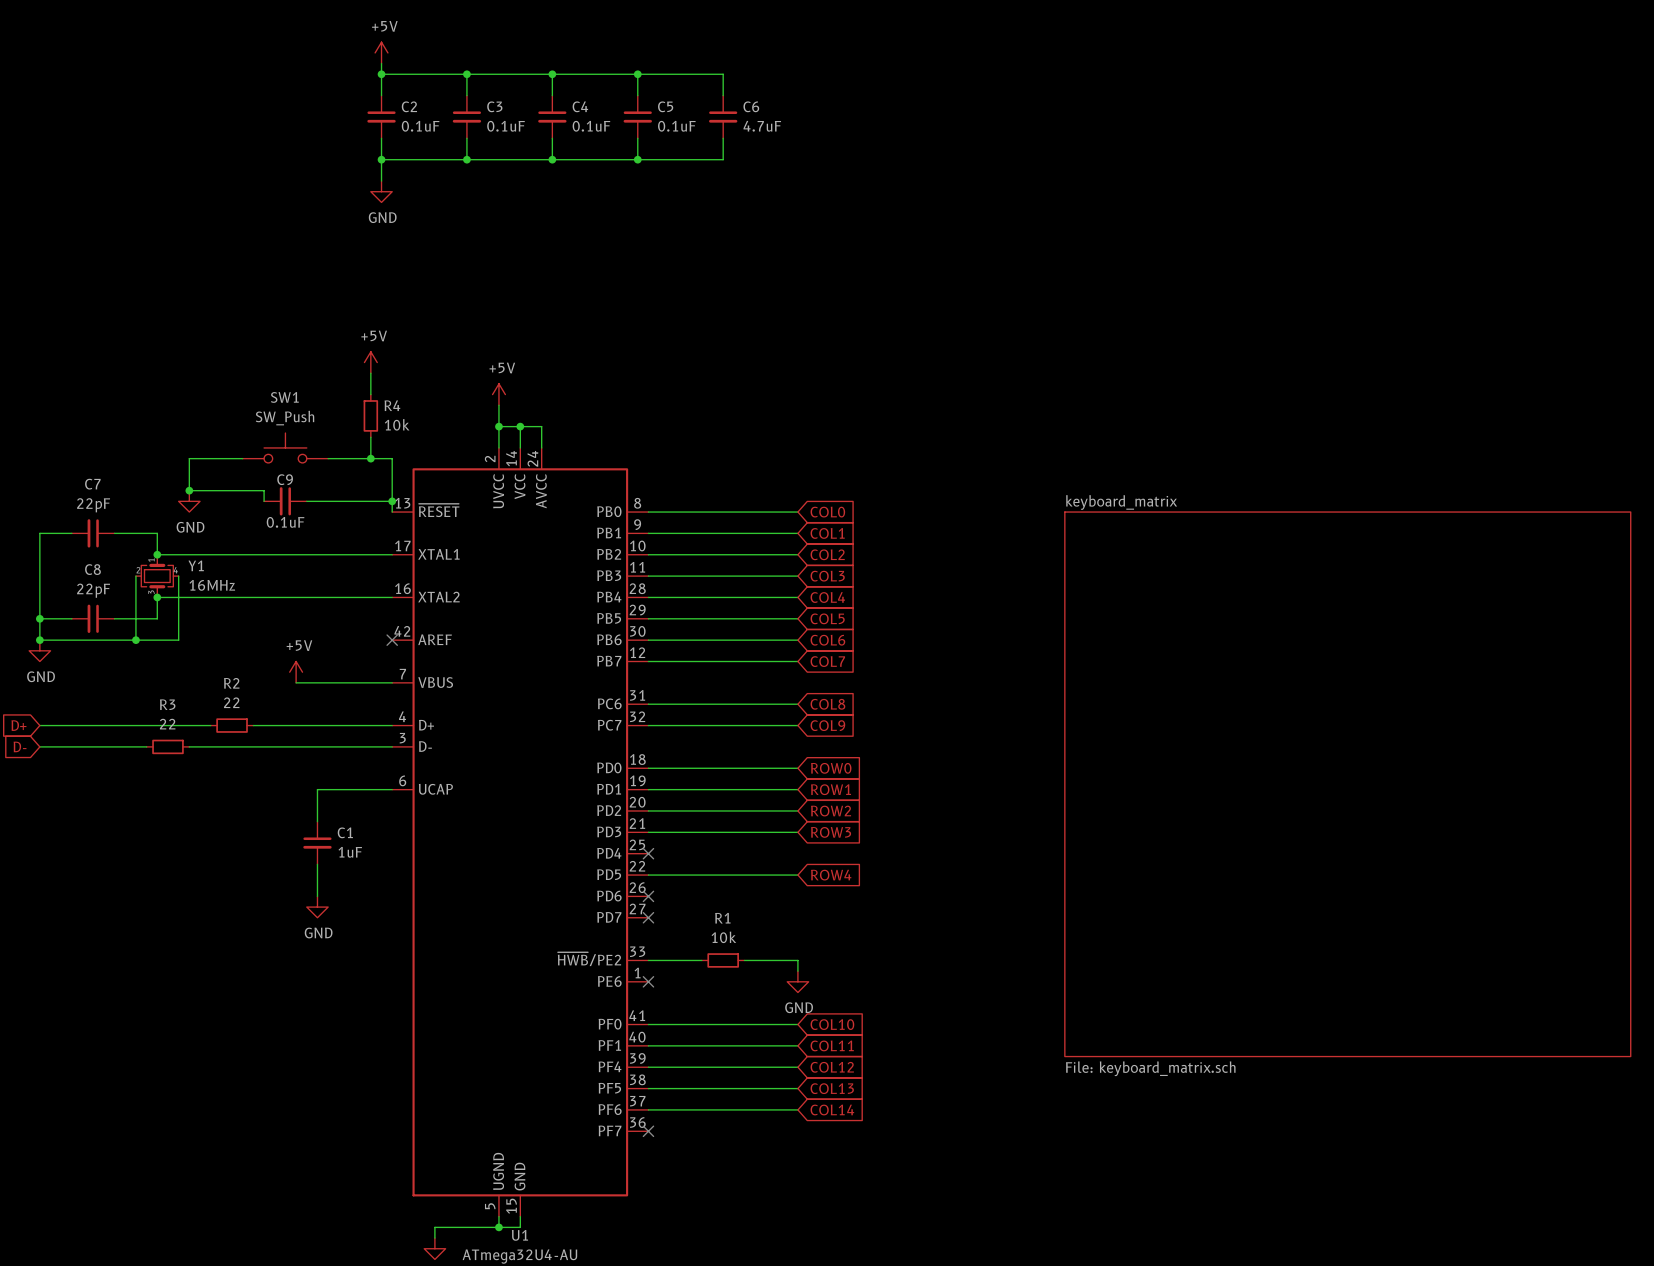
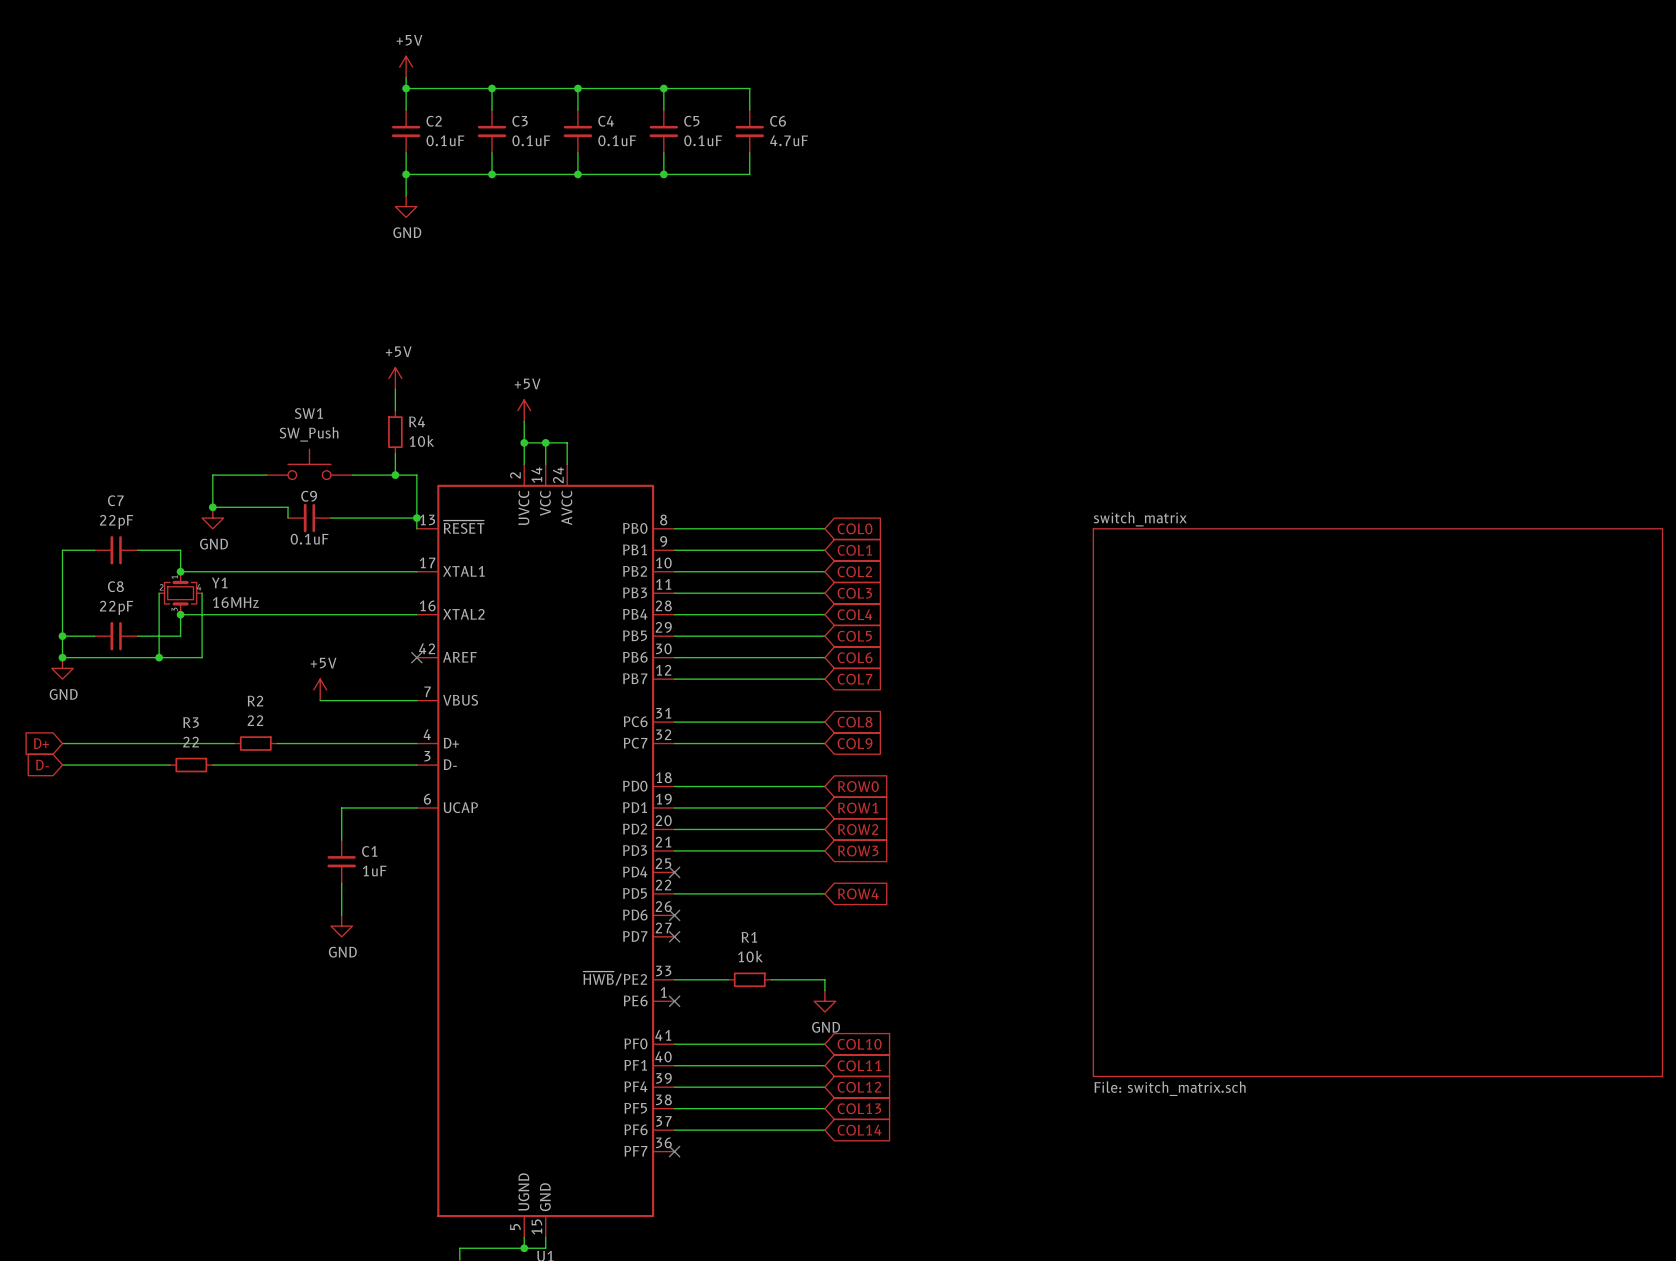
sheet keyboard_matrix name: keyboard_matrix (1121, 502) -> switch_matrix (1140, 519)
sheet keyboard_matrix value: File: keyboard_matrix.sch (1150, 1068) -> File: switch_matrix.sch (1170, 1088)

